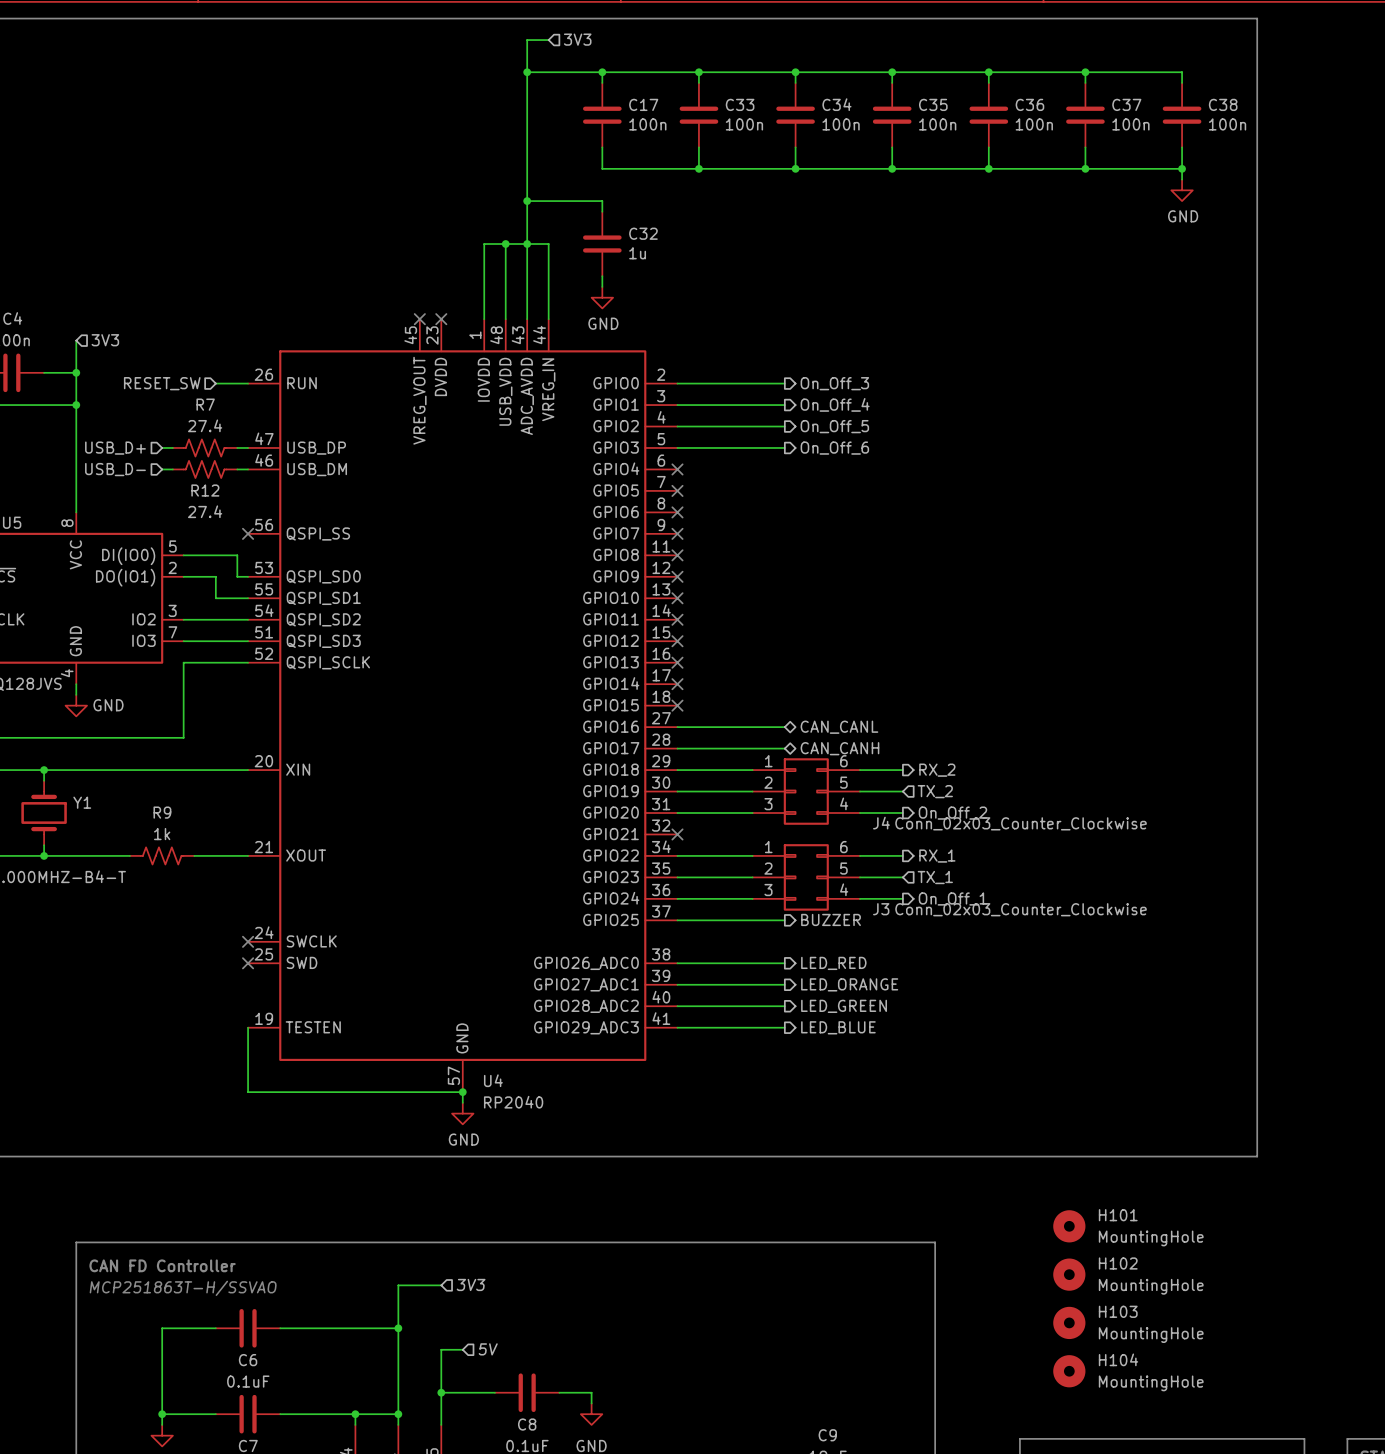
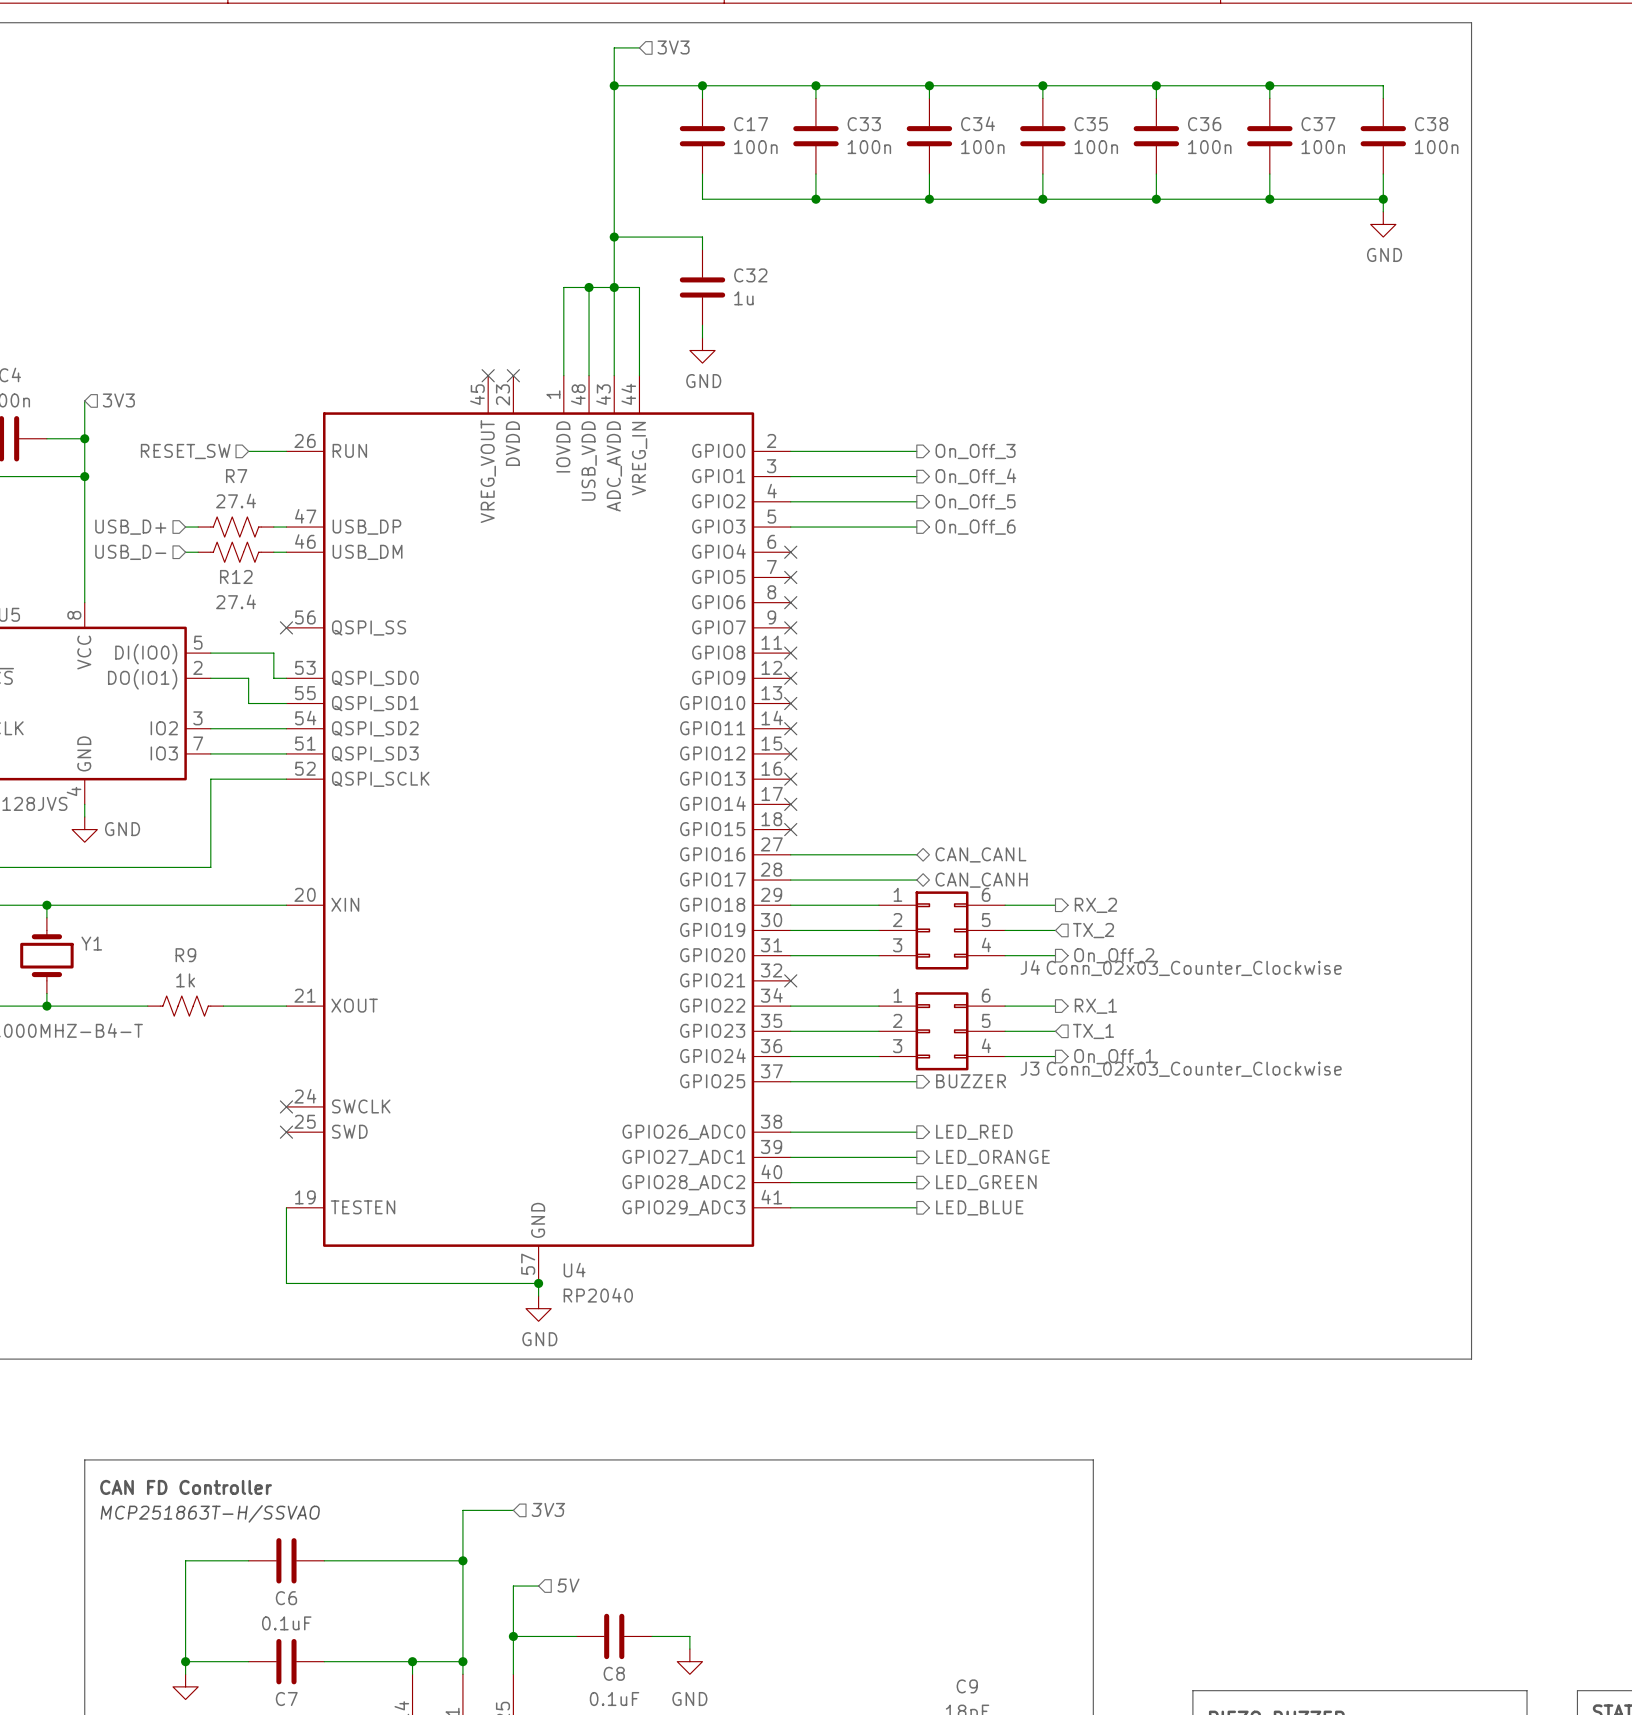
H101: MountingHole (1069, 1226) -> none
H102: MountingHole (1069, 1274) -> none
H103: MountingHole (1069, 1322) -> none
H104: MountingHole (1069, 1371) -> none

